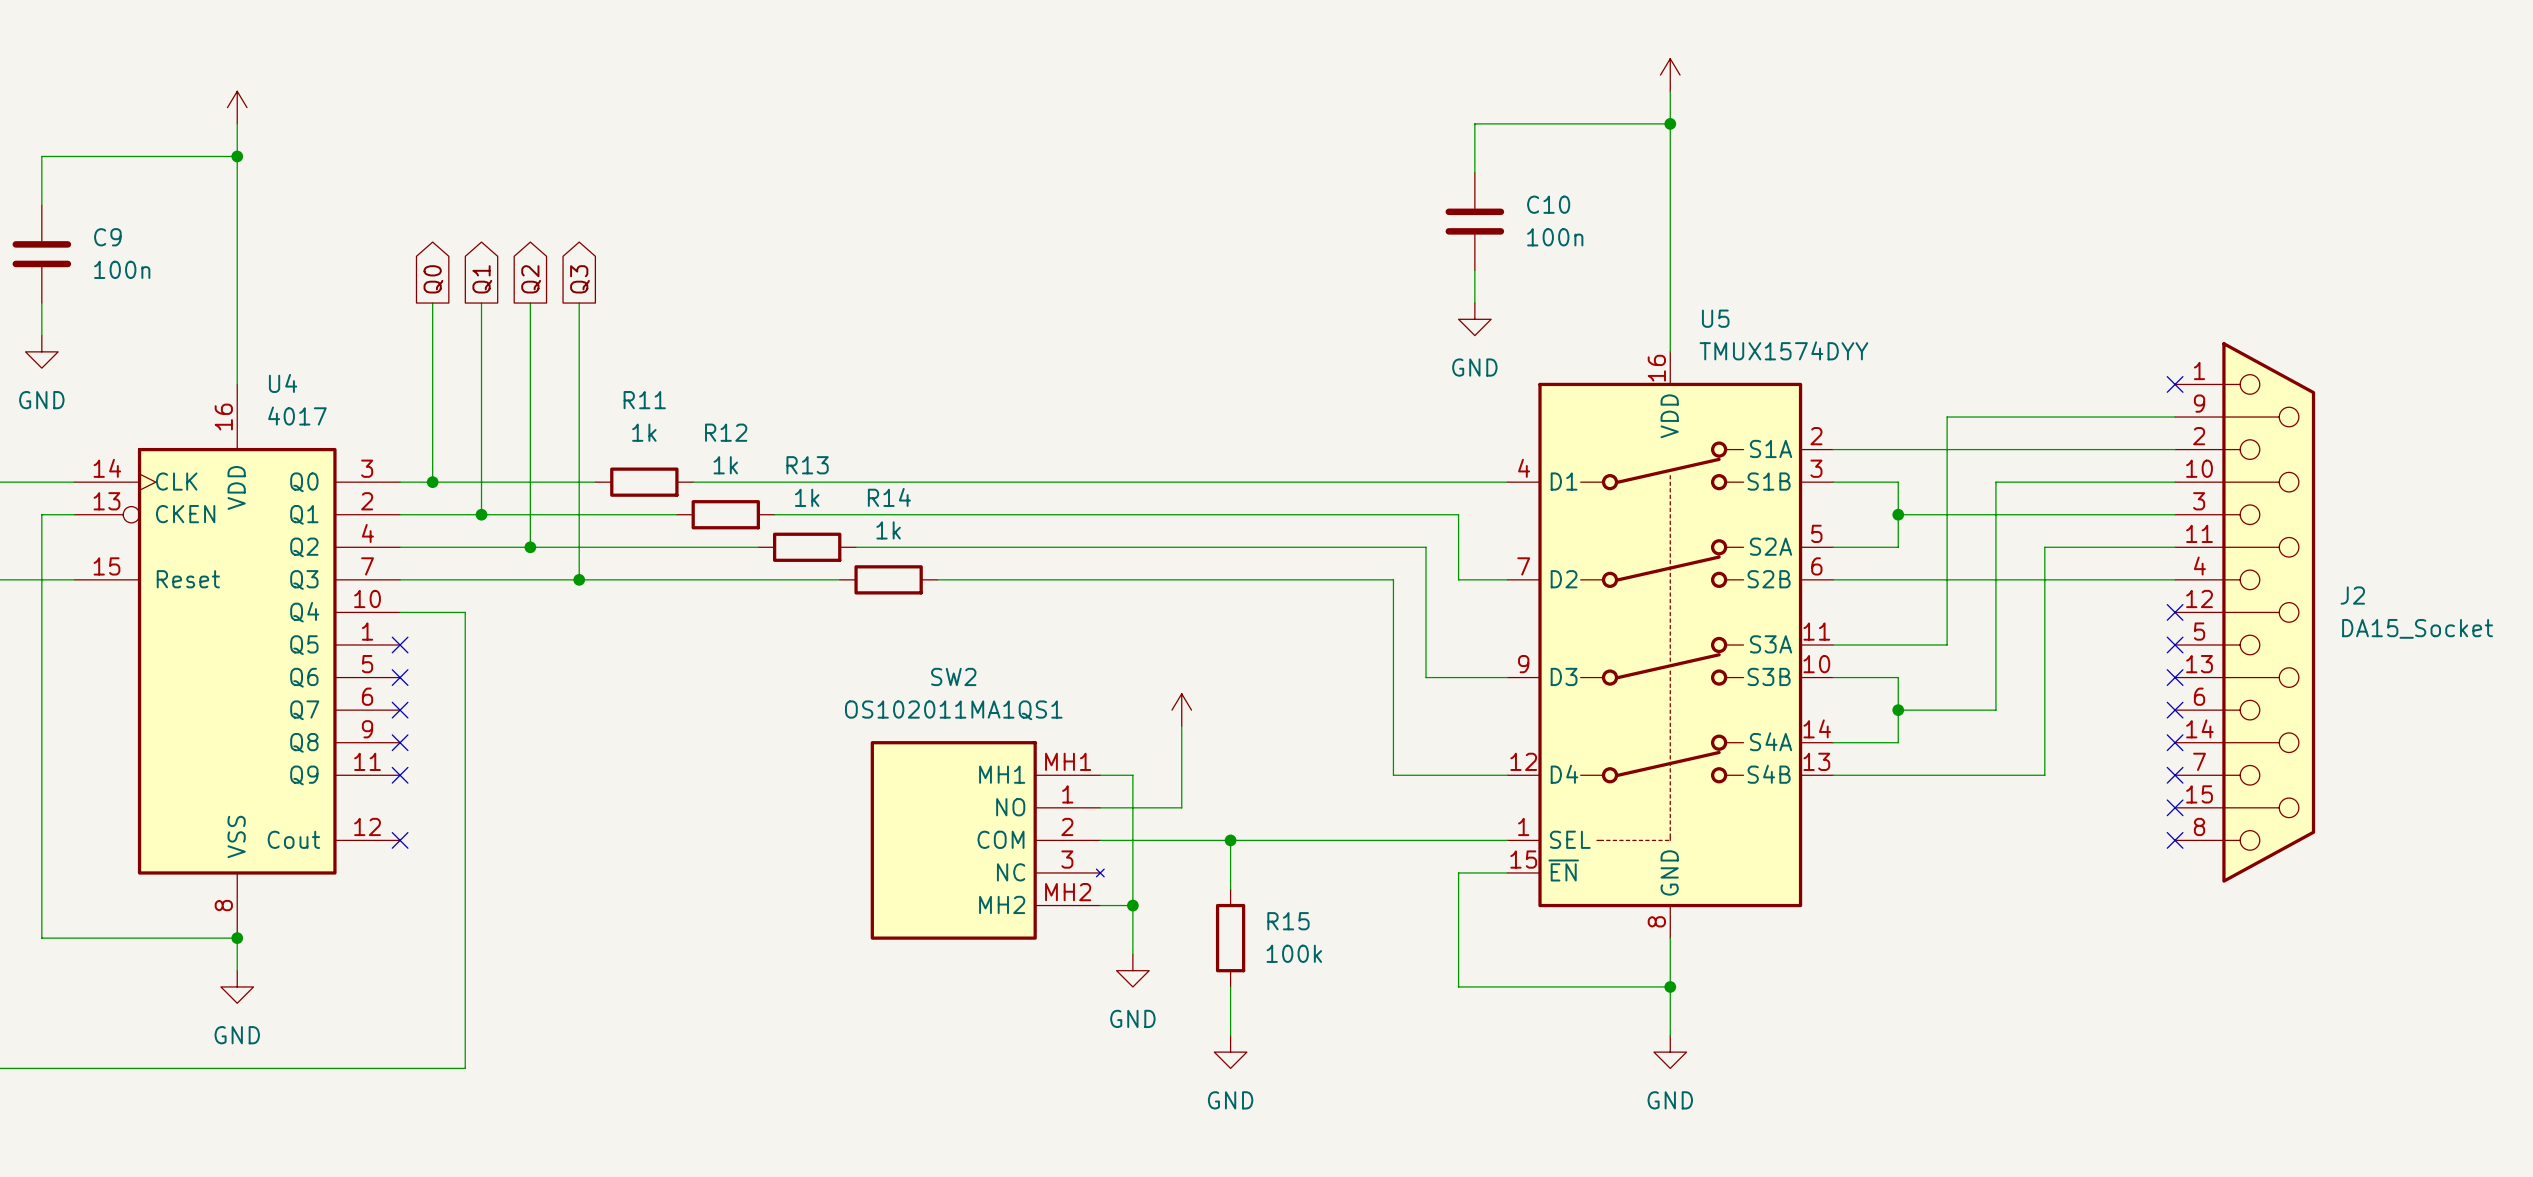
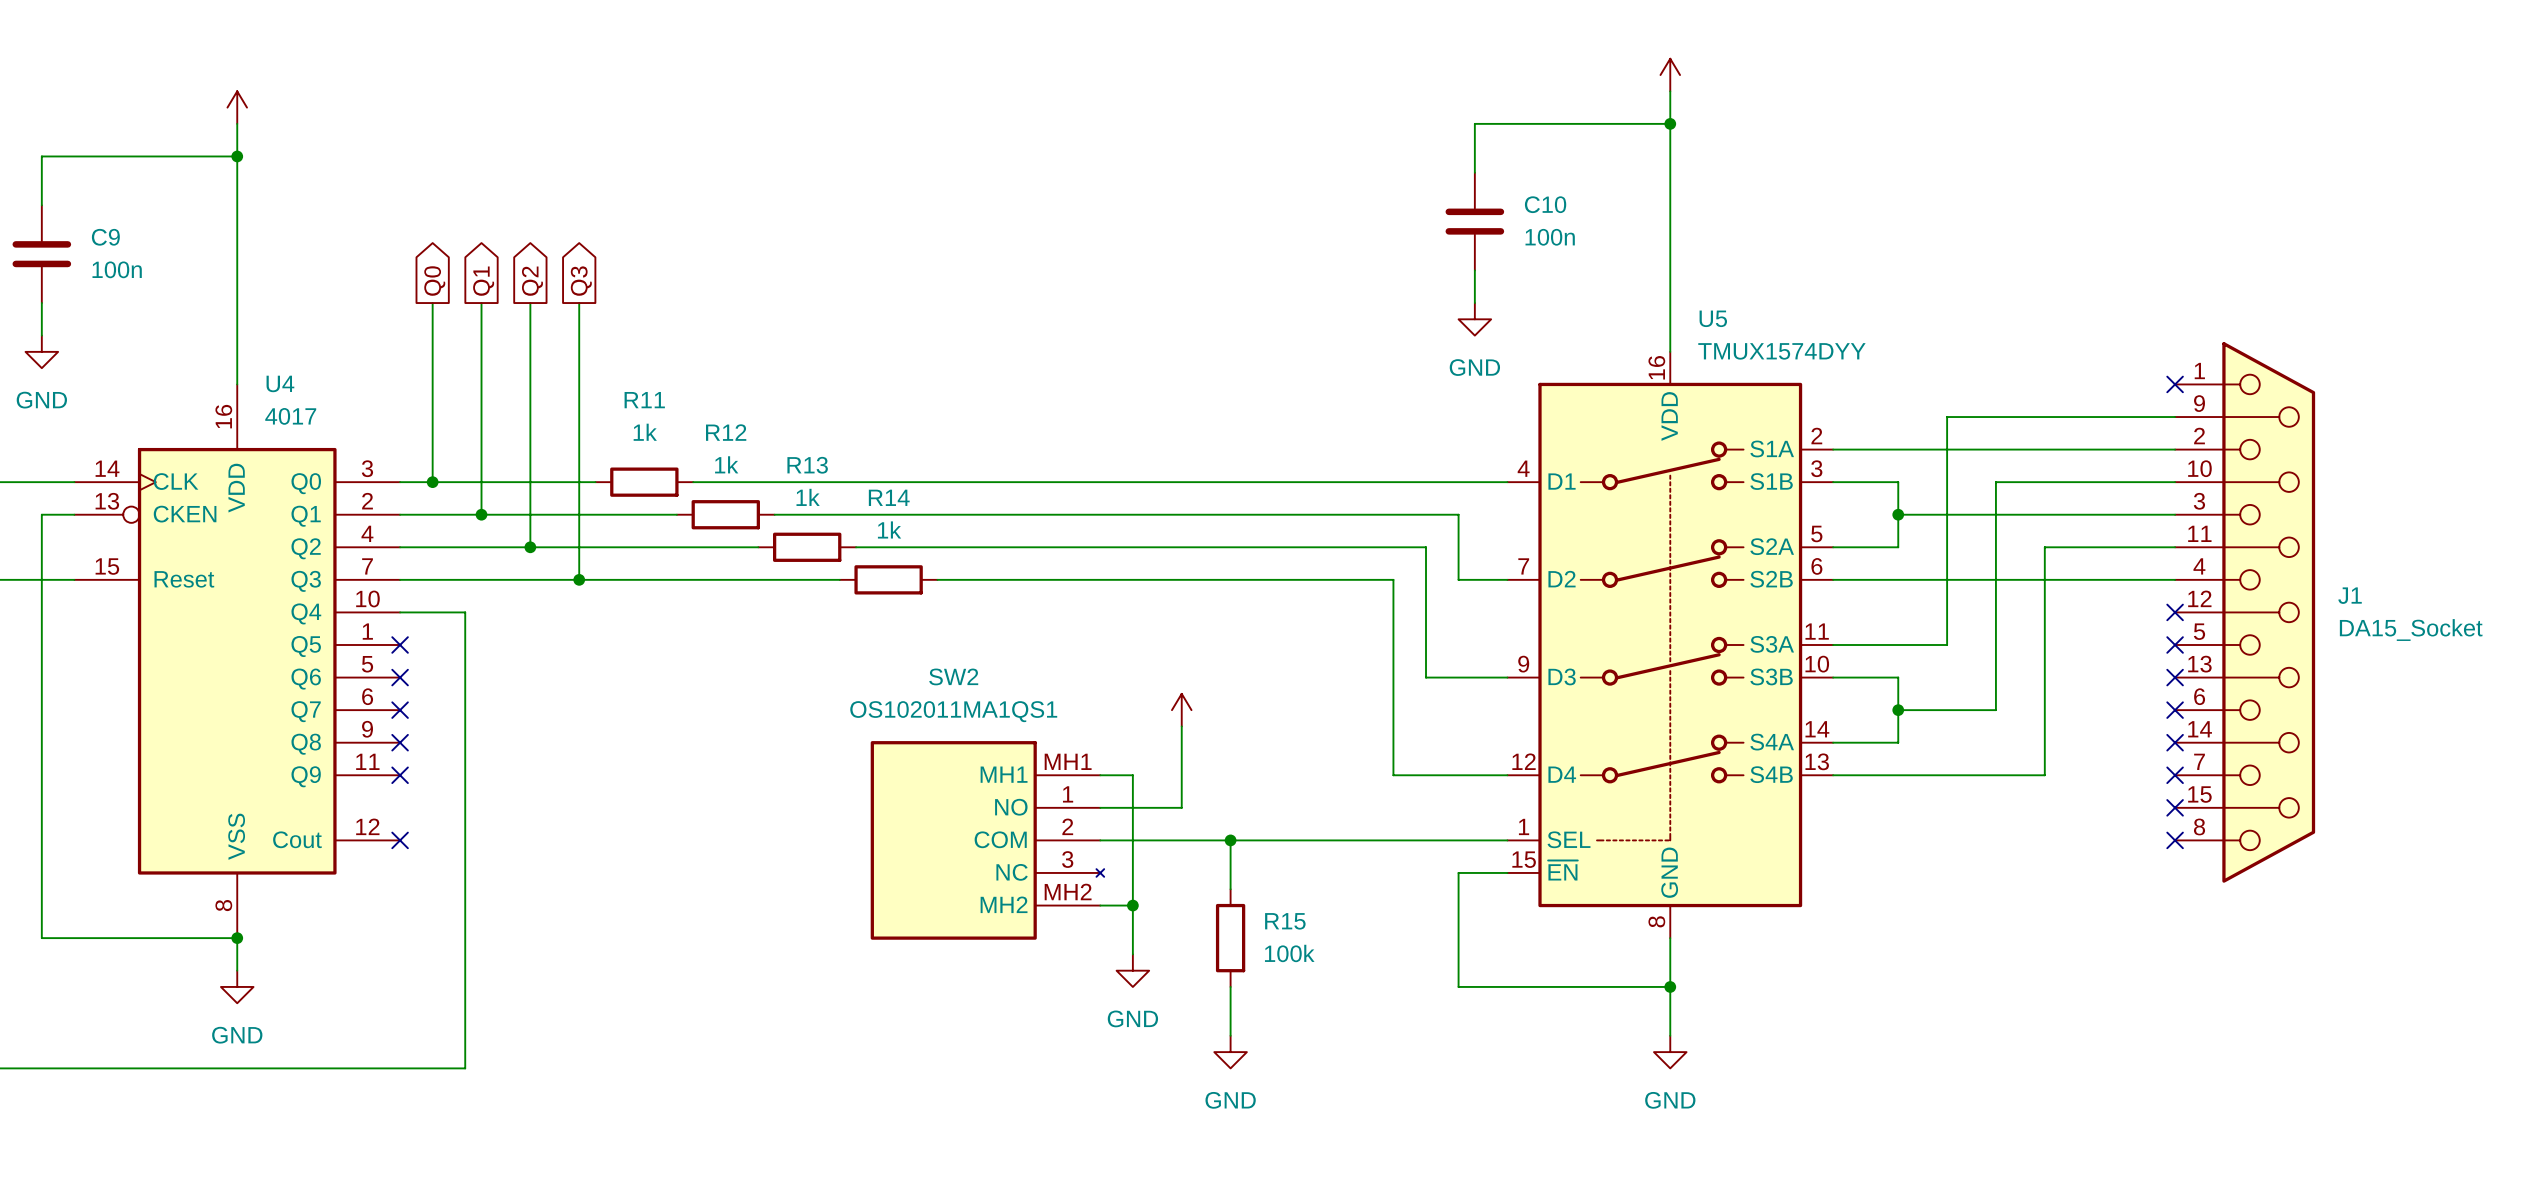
J2 name: J2 (2352, 595) -> J1 (2350, 595)

